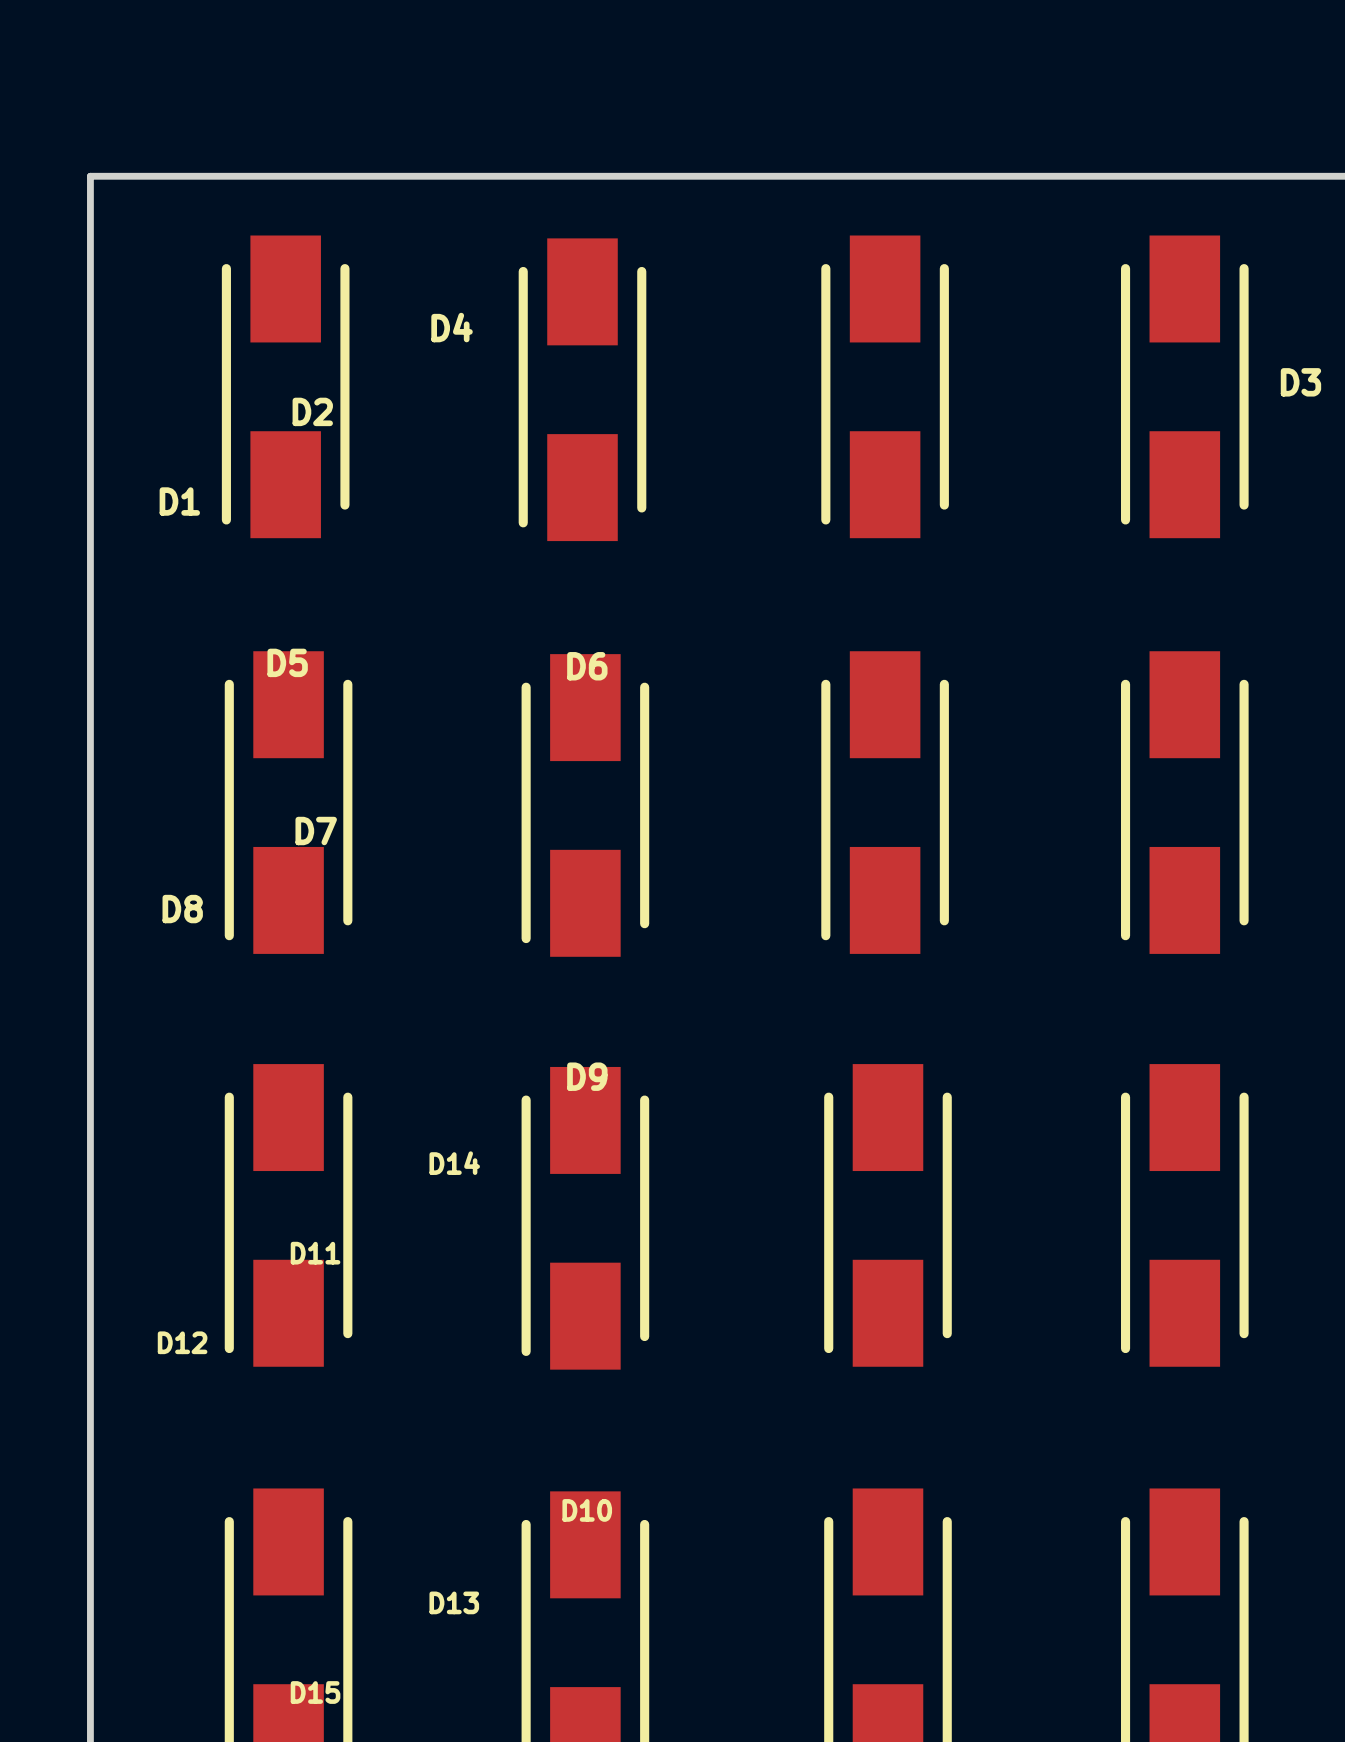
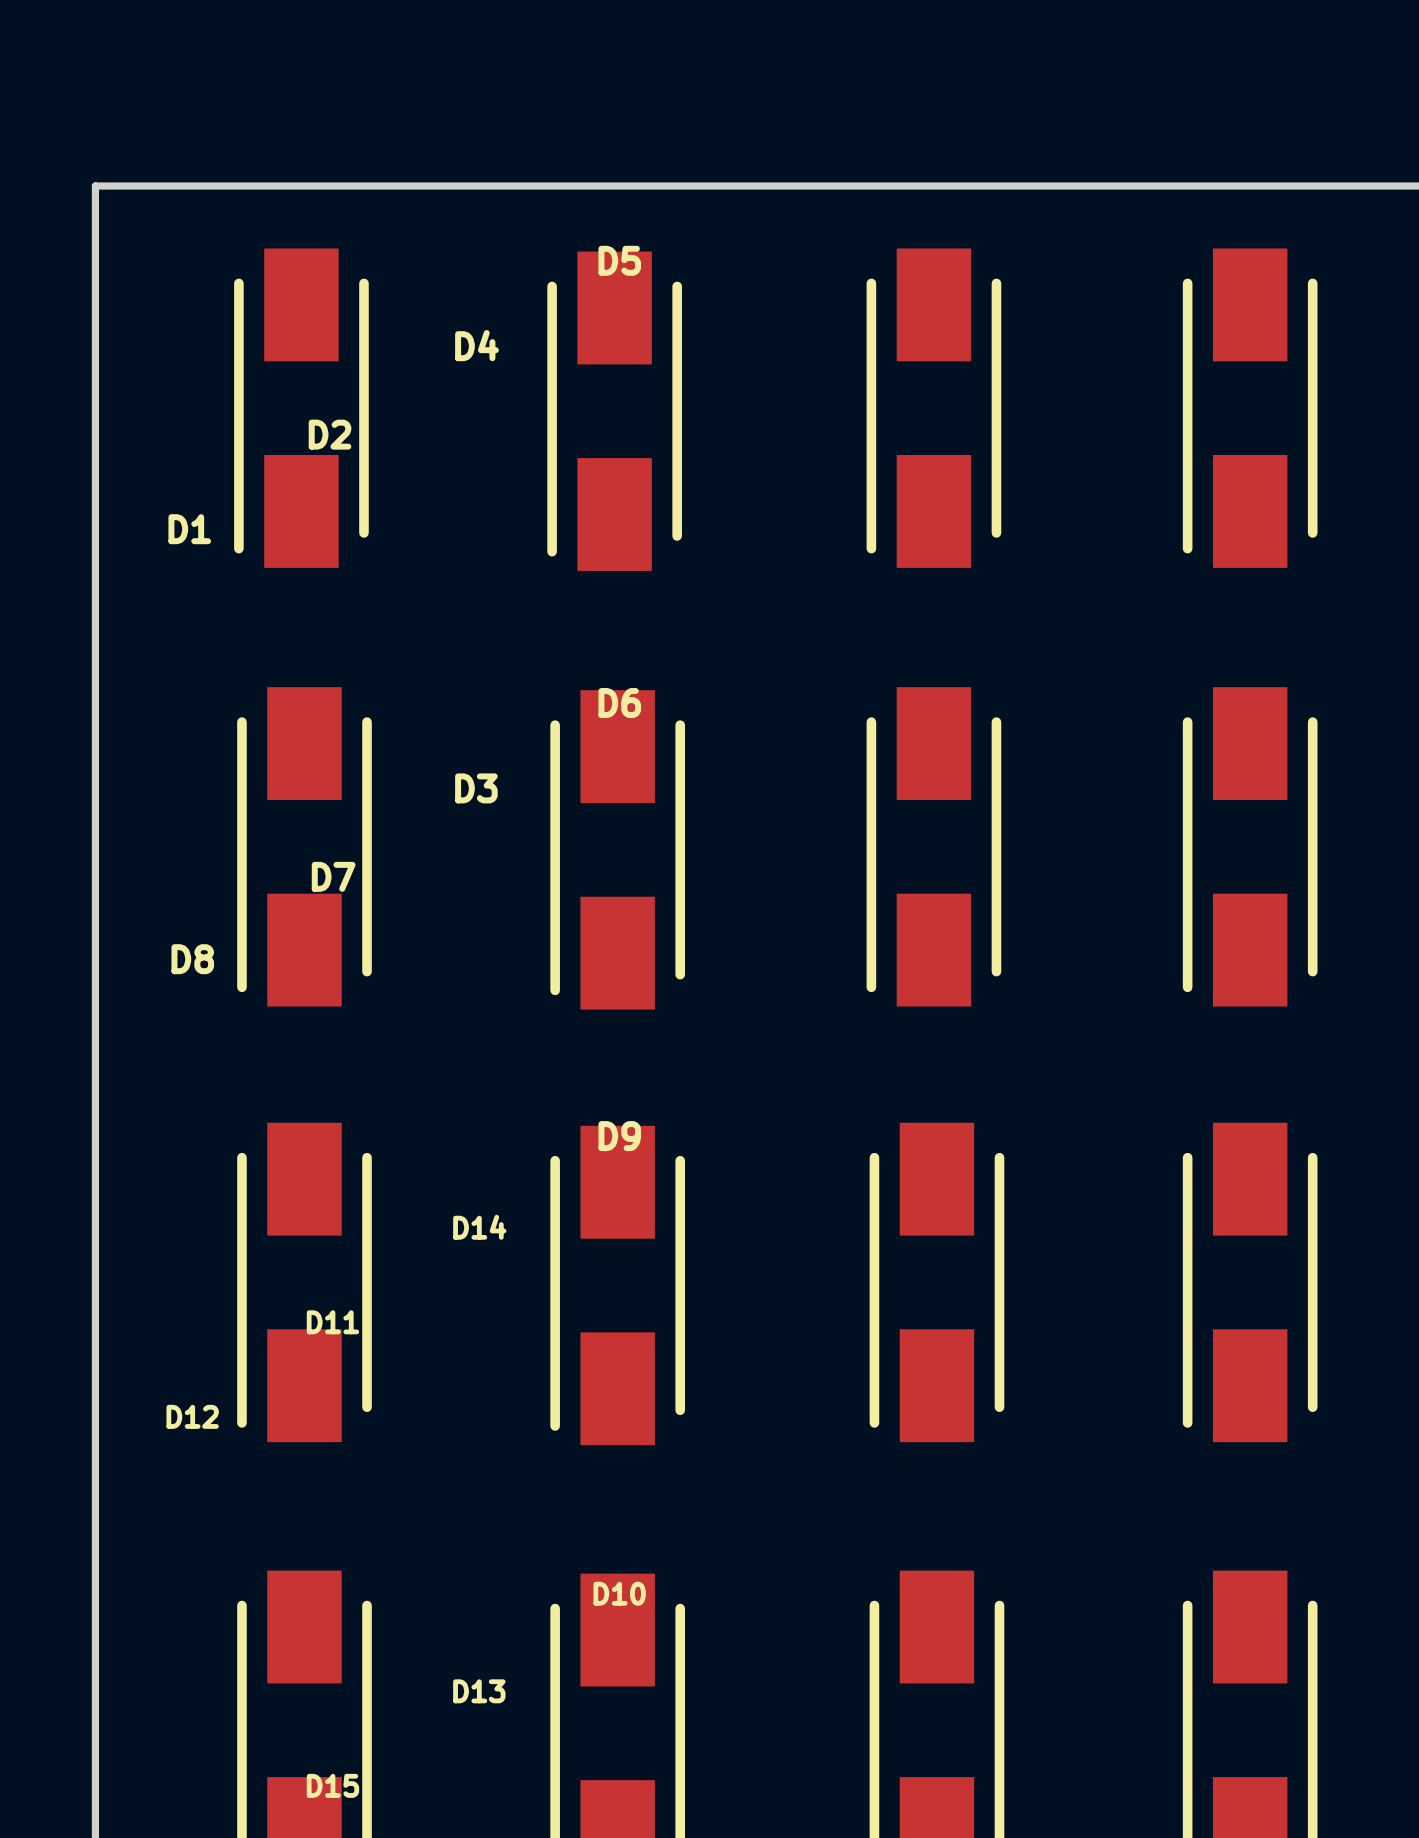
D3 name: D3 (1300, 382) -> D5 (619, 260)
D5 name: D5 (287, 662) -> D3 (476, 788)

